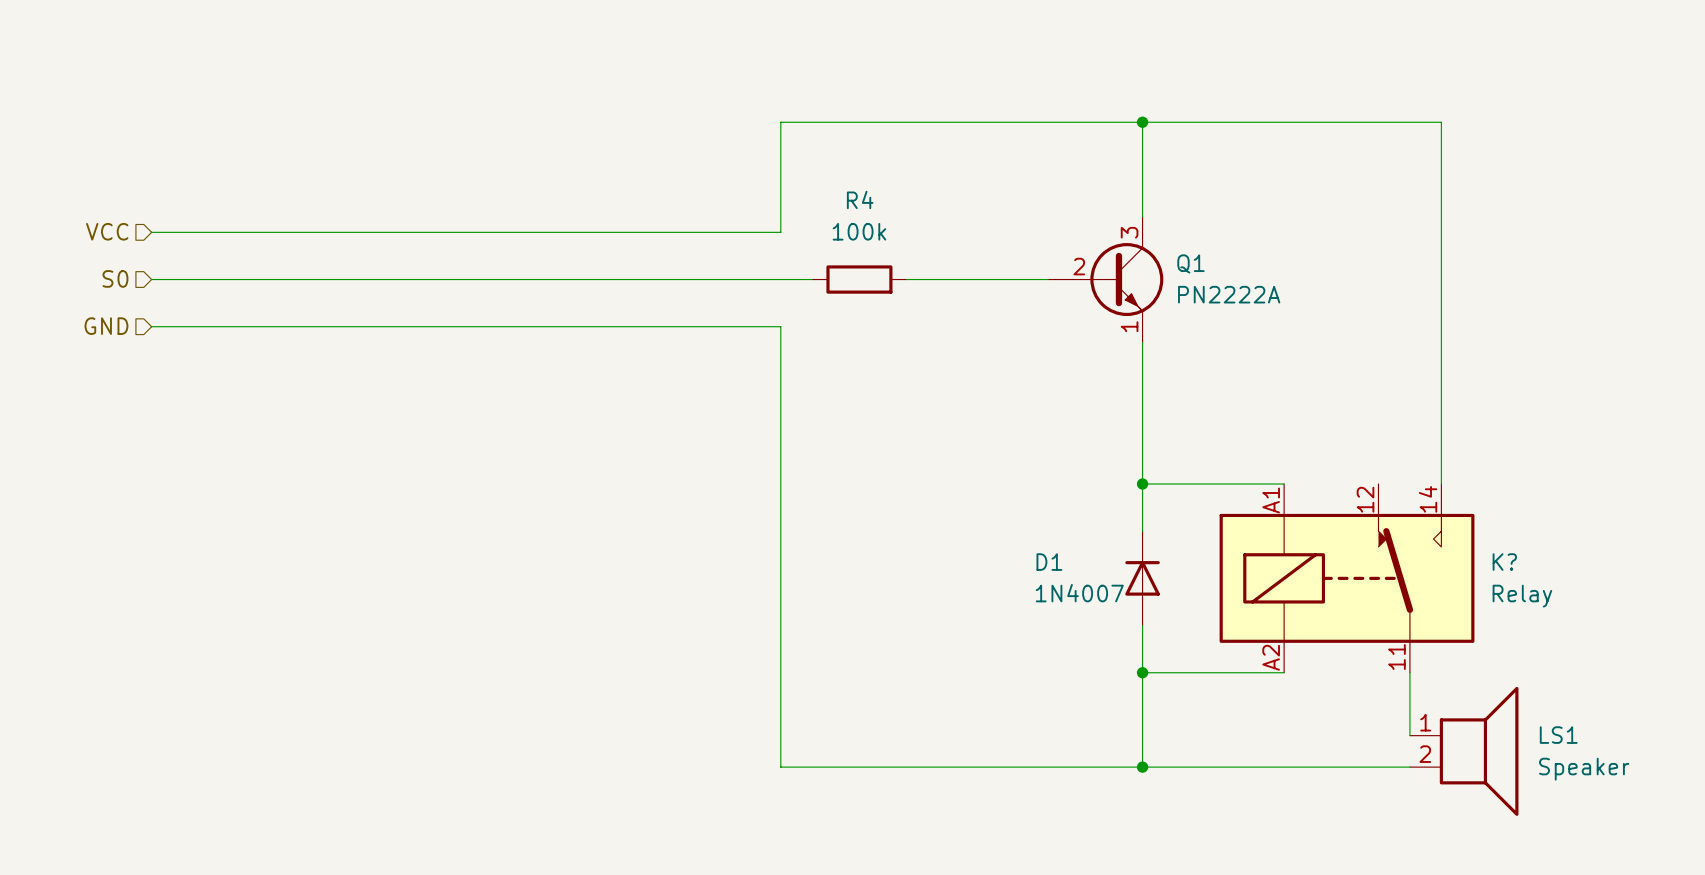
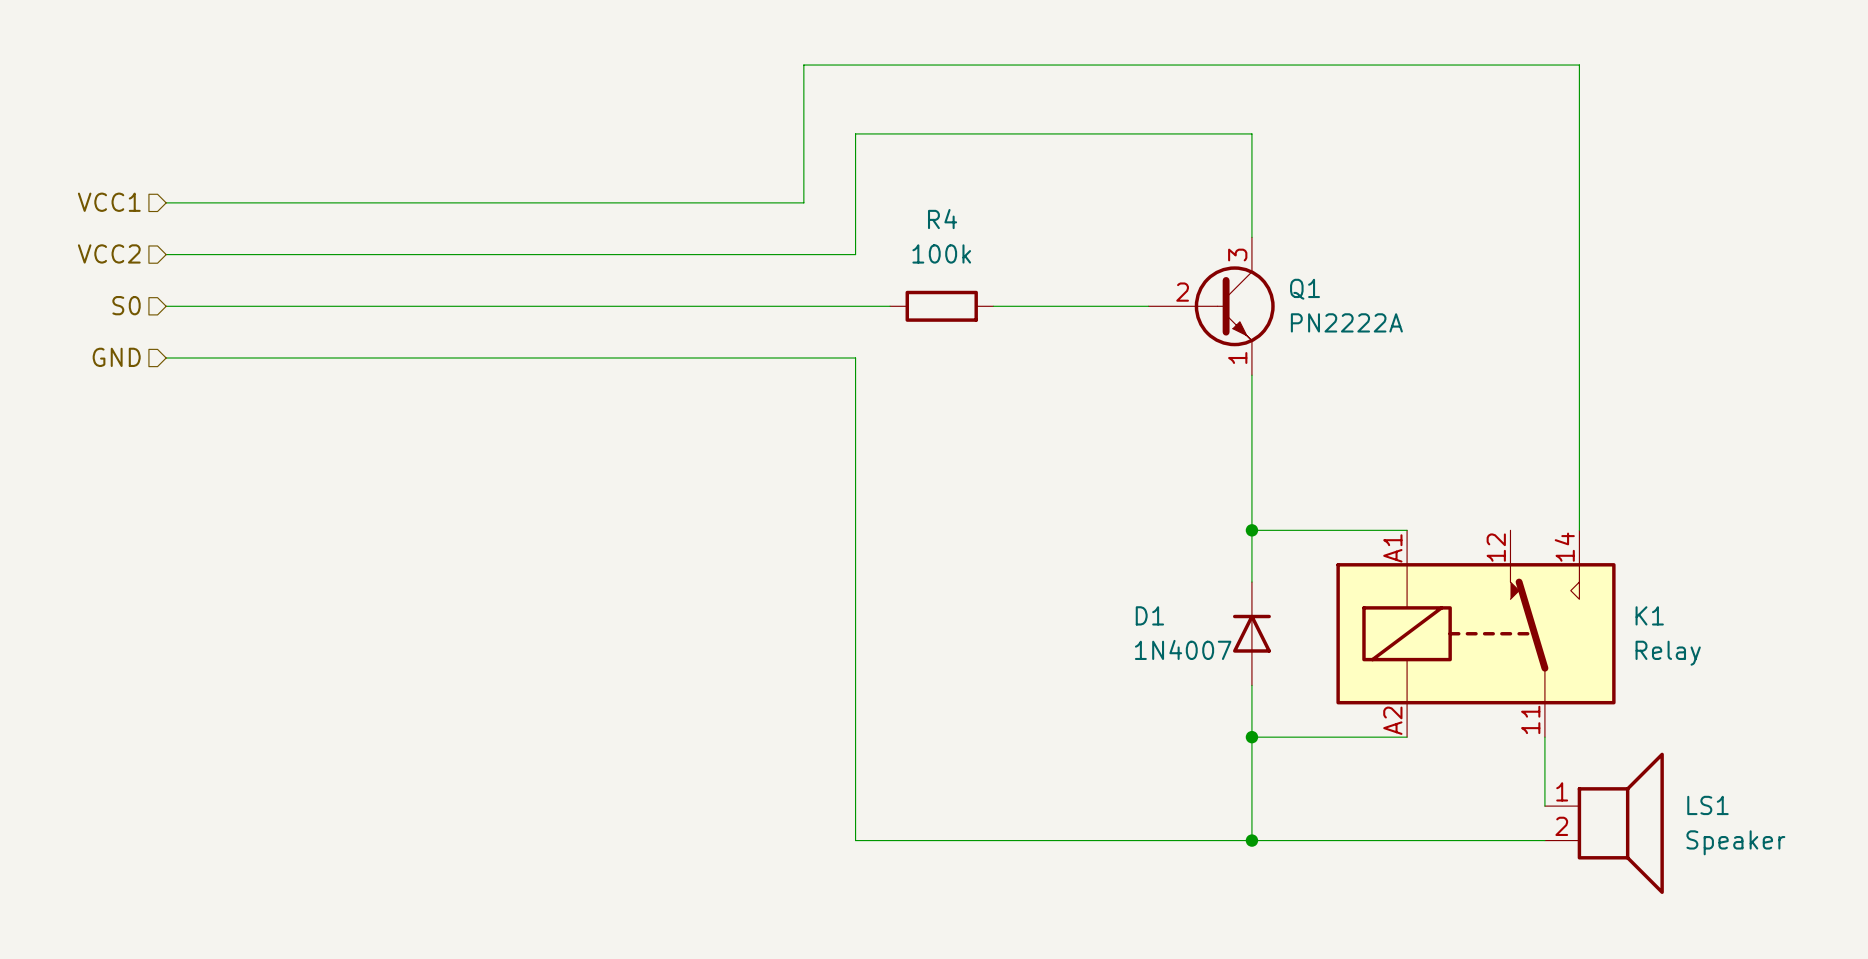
wire: (1142, 122) (1441, 122) -> (166, 202) (803, 202) (803, 65) (1579, 65) (1579, 133)
junction: (1142, 122) -> none
hierarchical label: none -> VCC1 (109, 202)
hierarchical label: VCC (107, 231) -> VCC2 (109, 253)
K? name: K? (1504, 562) -> K1 (1649, 615)

